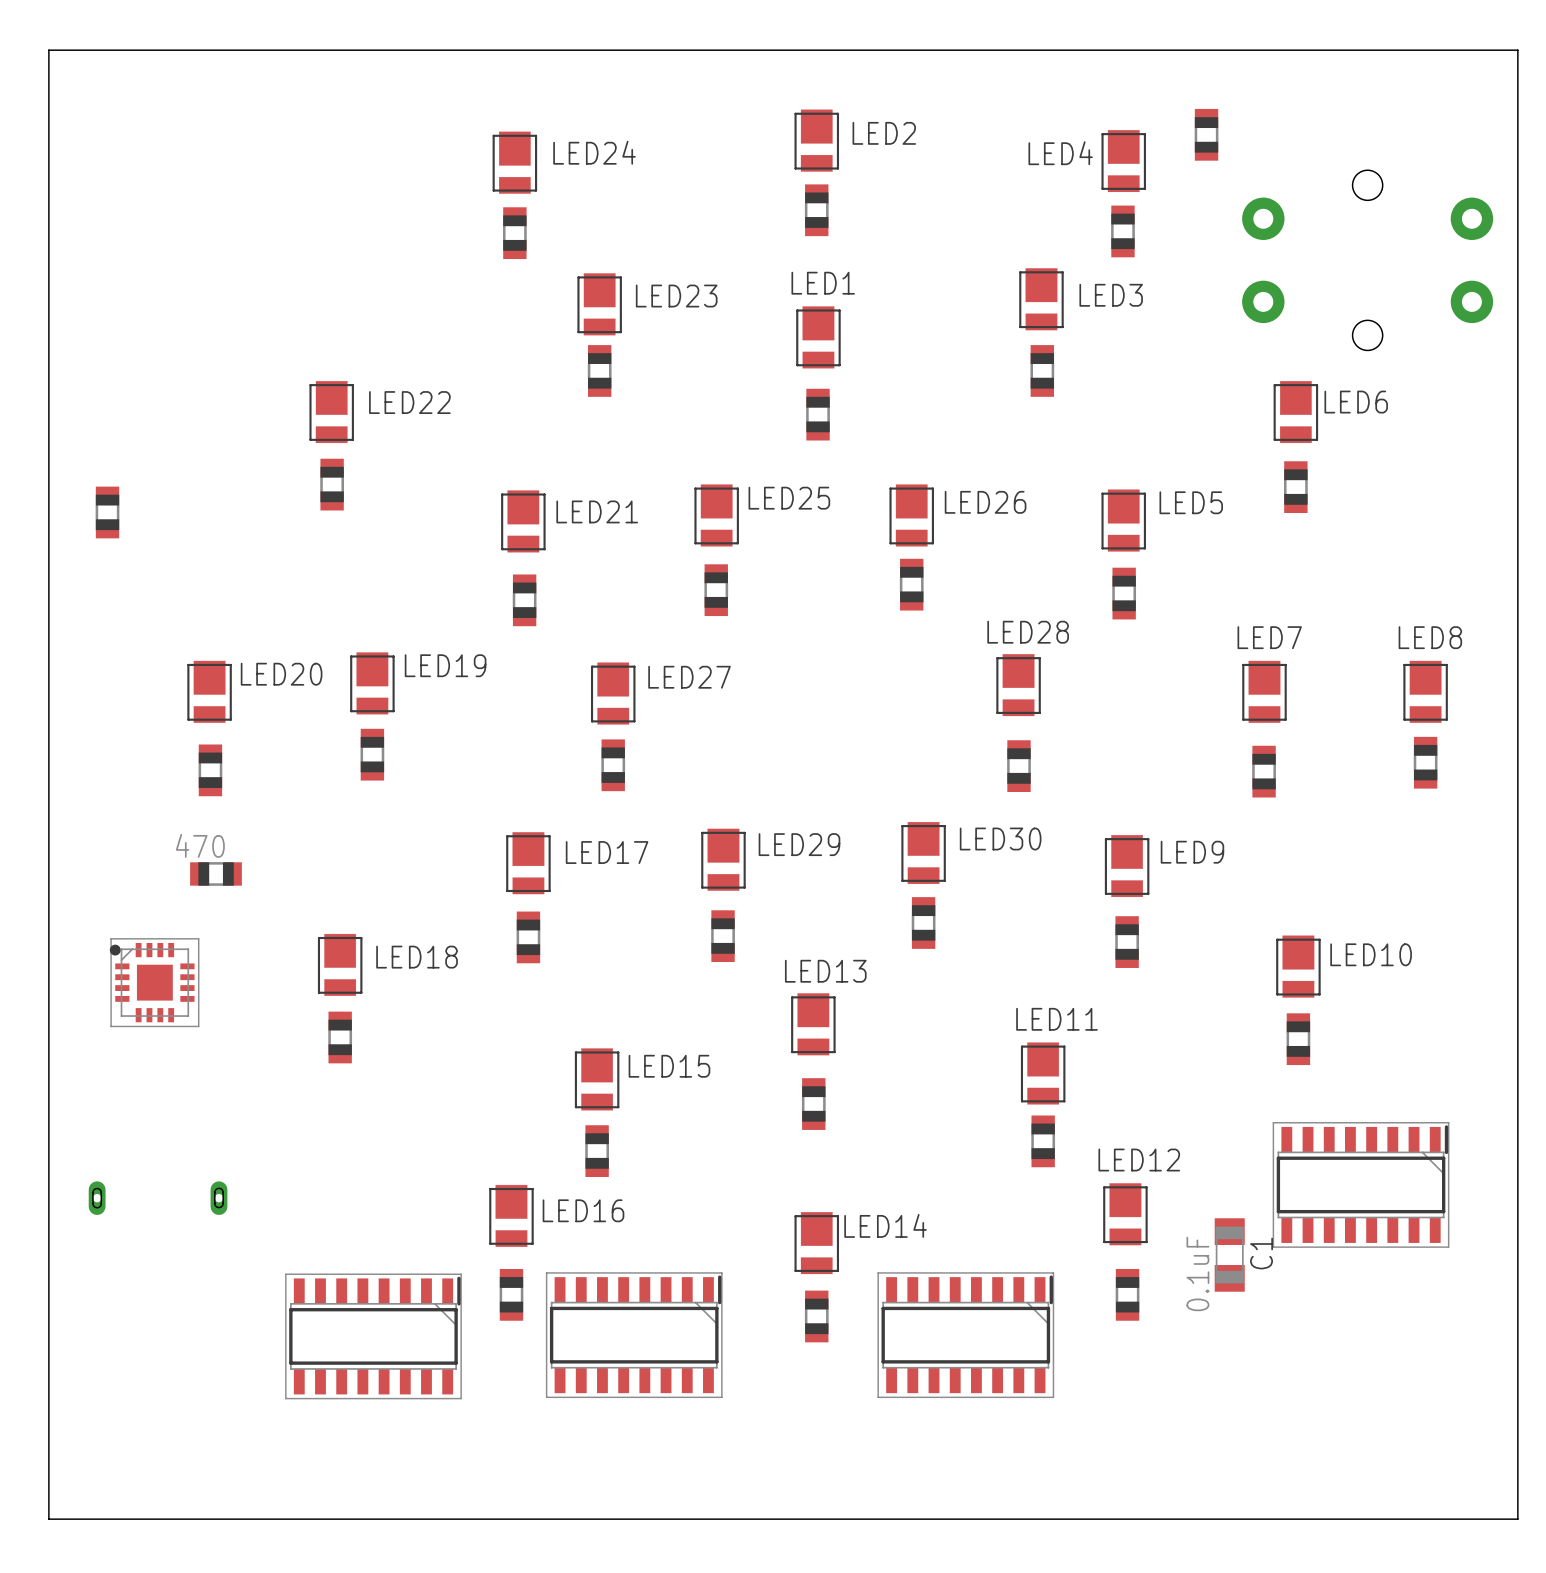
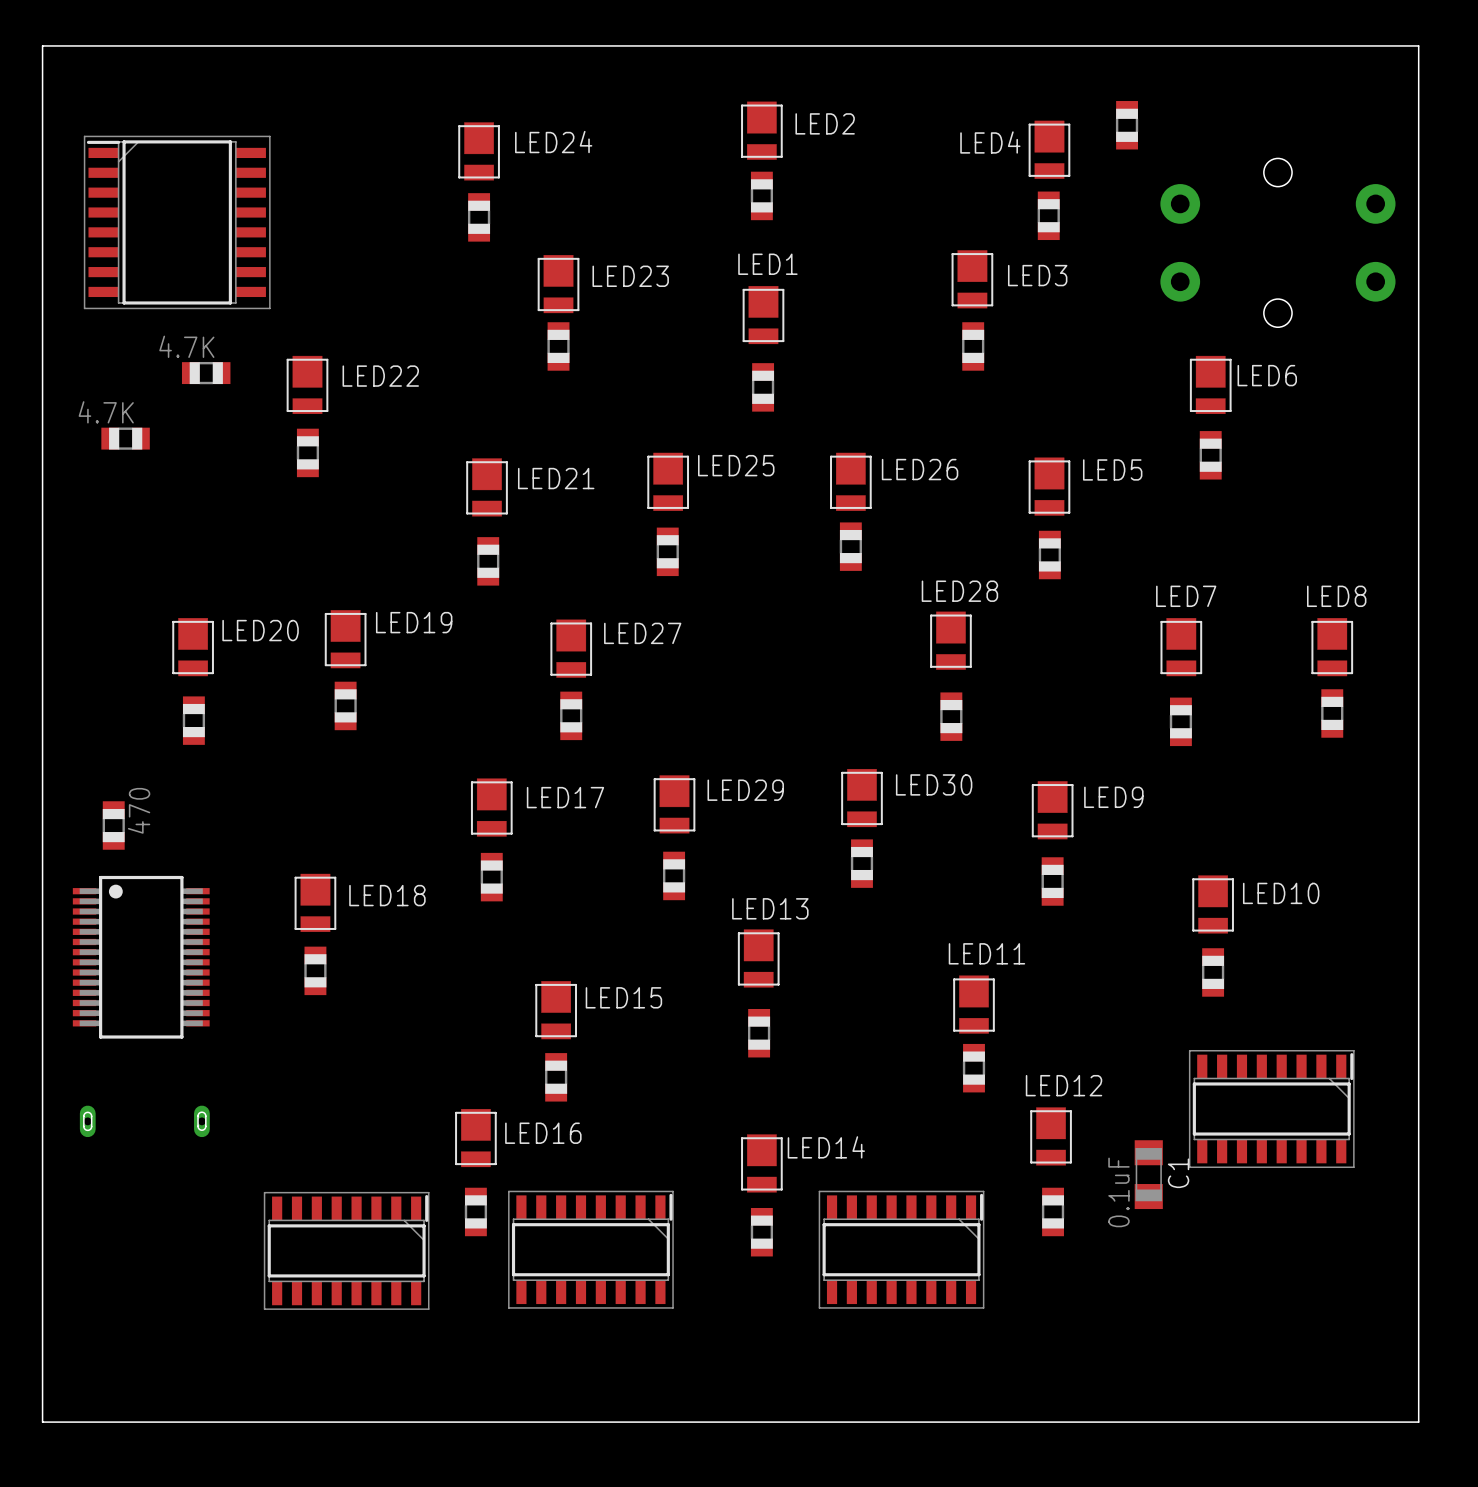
part: none -> (177, 222)
part: none -> 4.7K (206, 373)
part: none -> 4.7K (125, 438)
part: (107, 512) -> none
part rotation: 0° (215, 873) -> 90° clockwise (113, 825)
part position: (215, 873) -> (113, 825)
part: (154, 982) -> none
part: none -> (141, 957)

